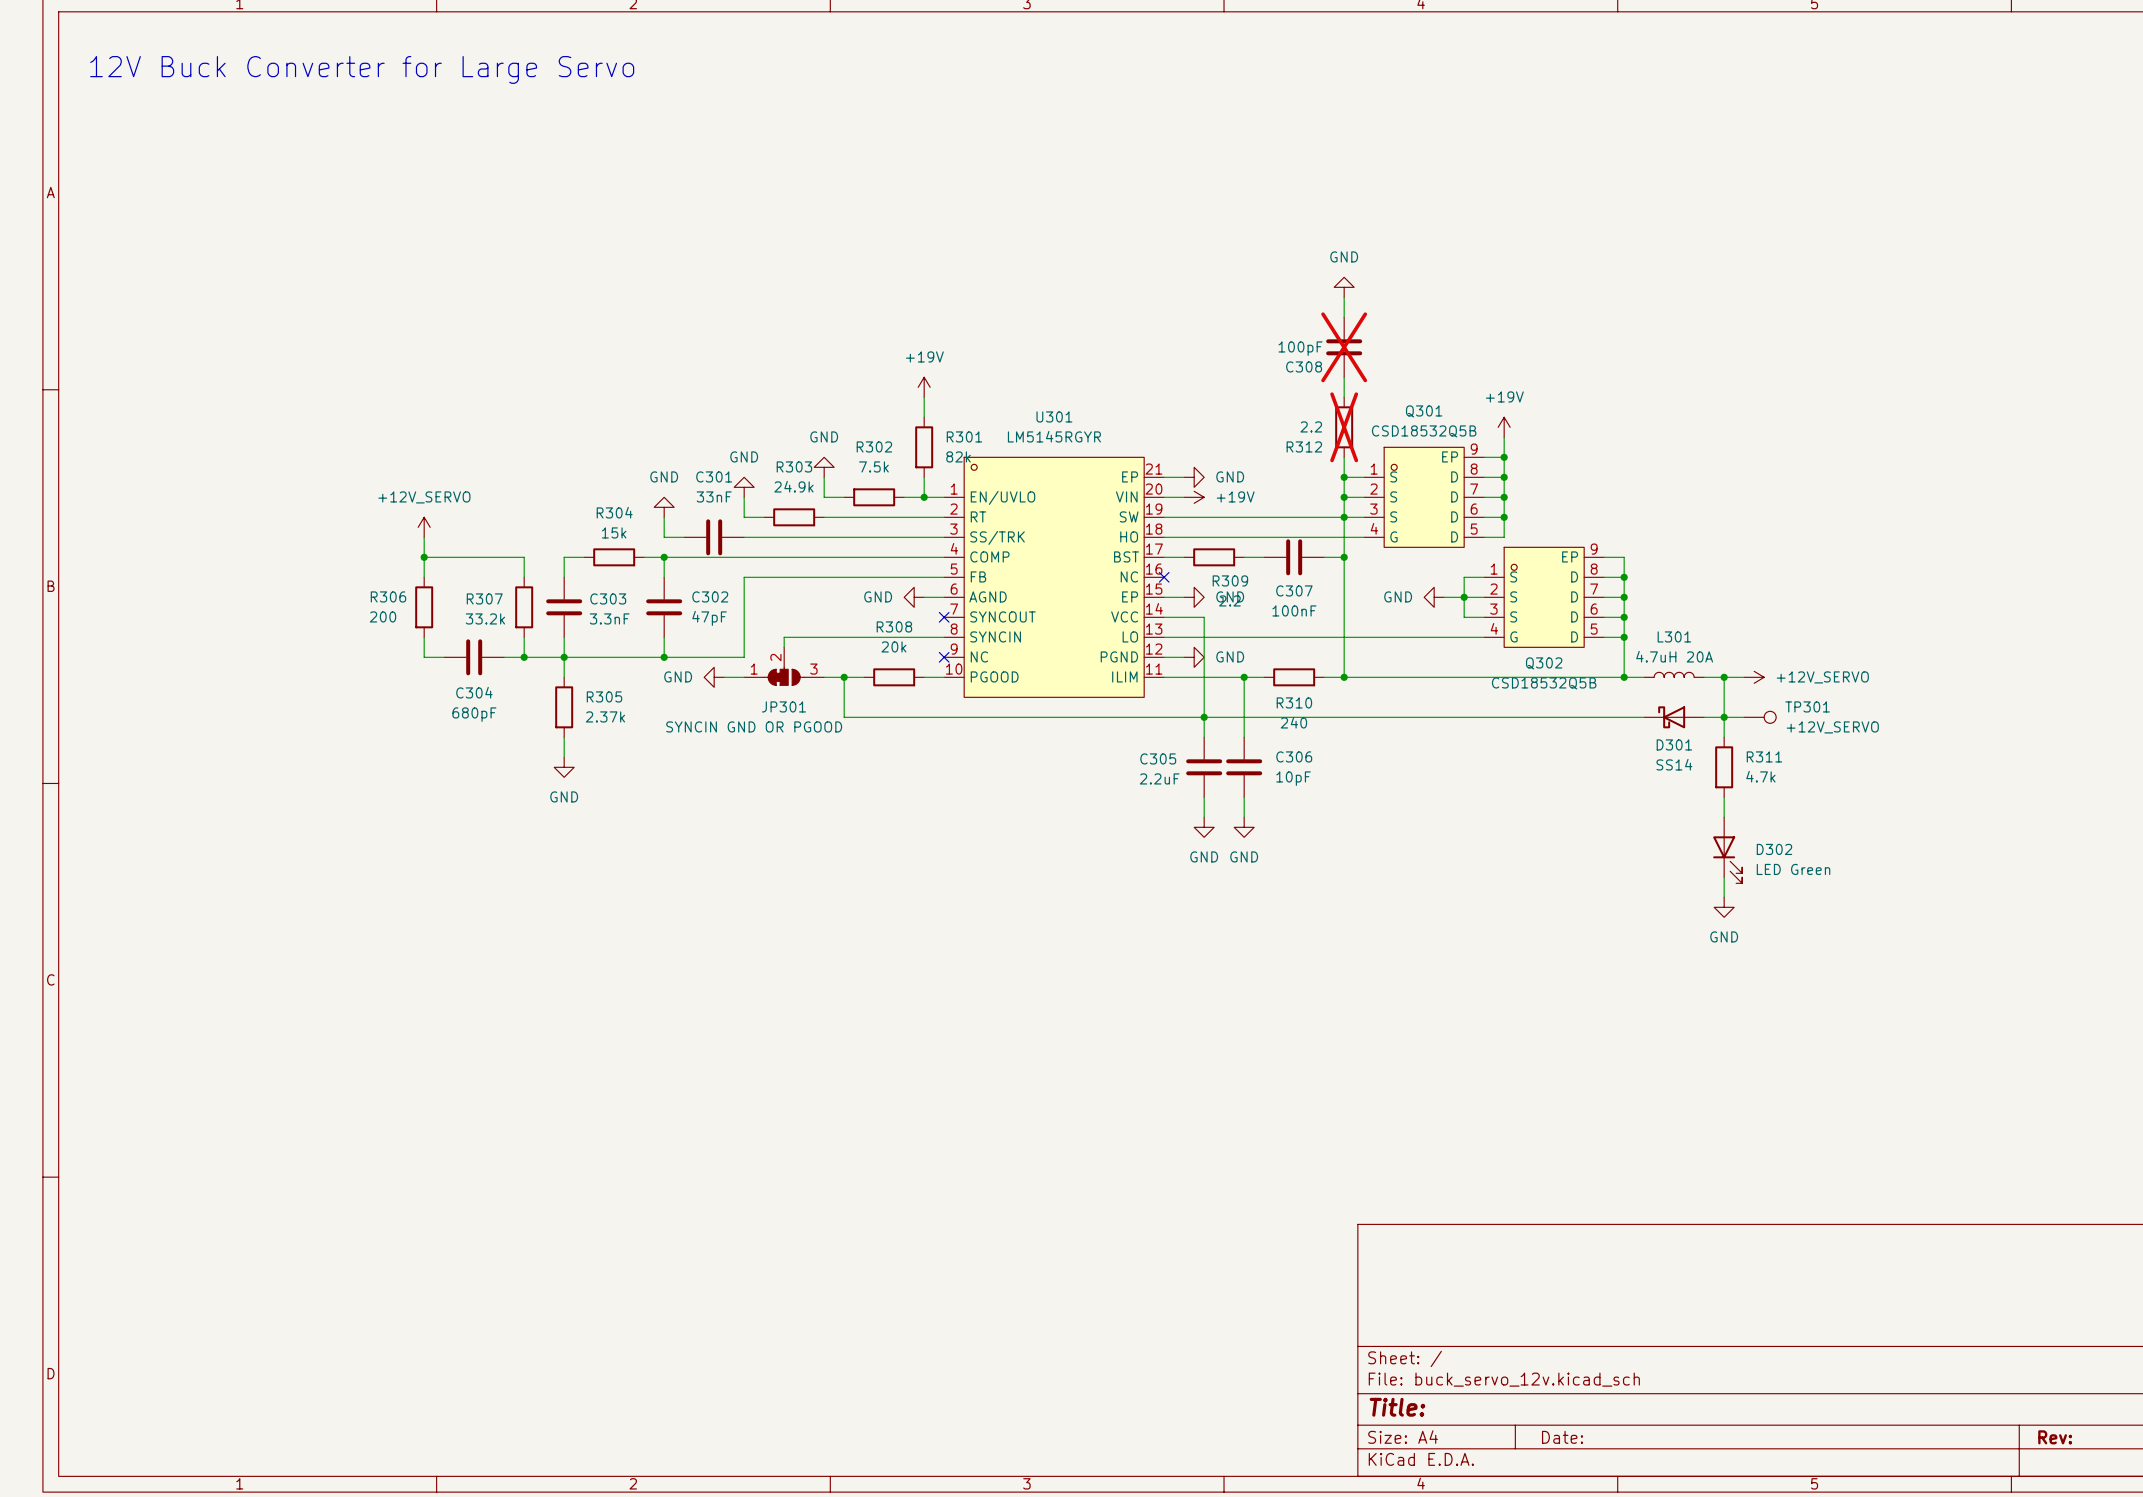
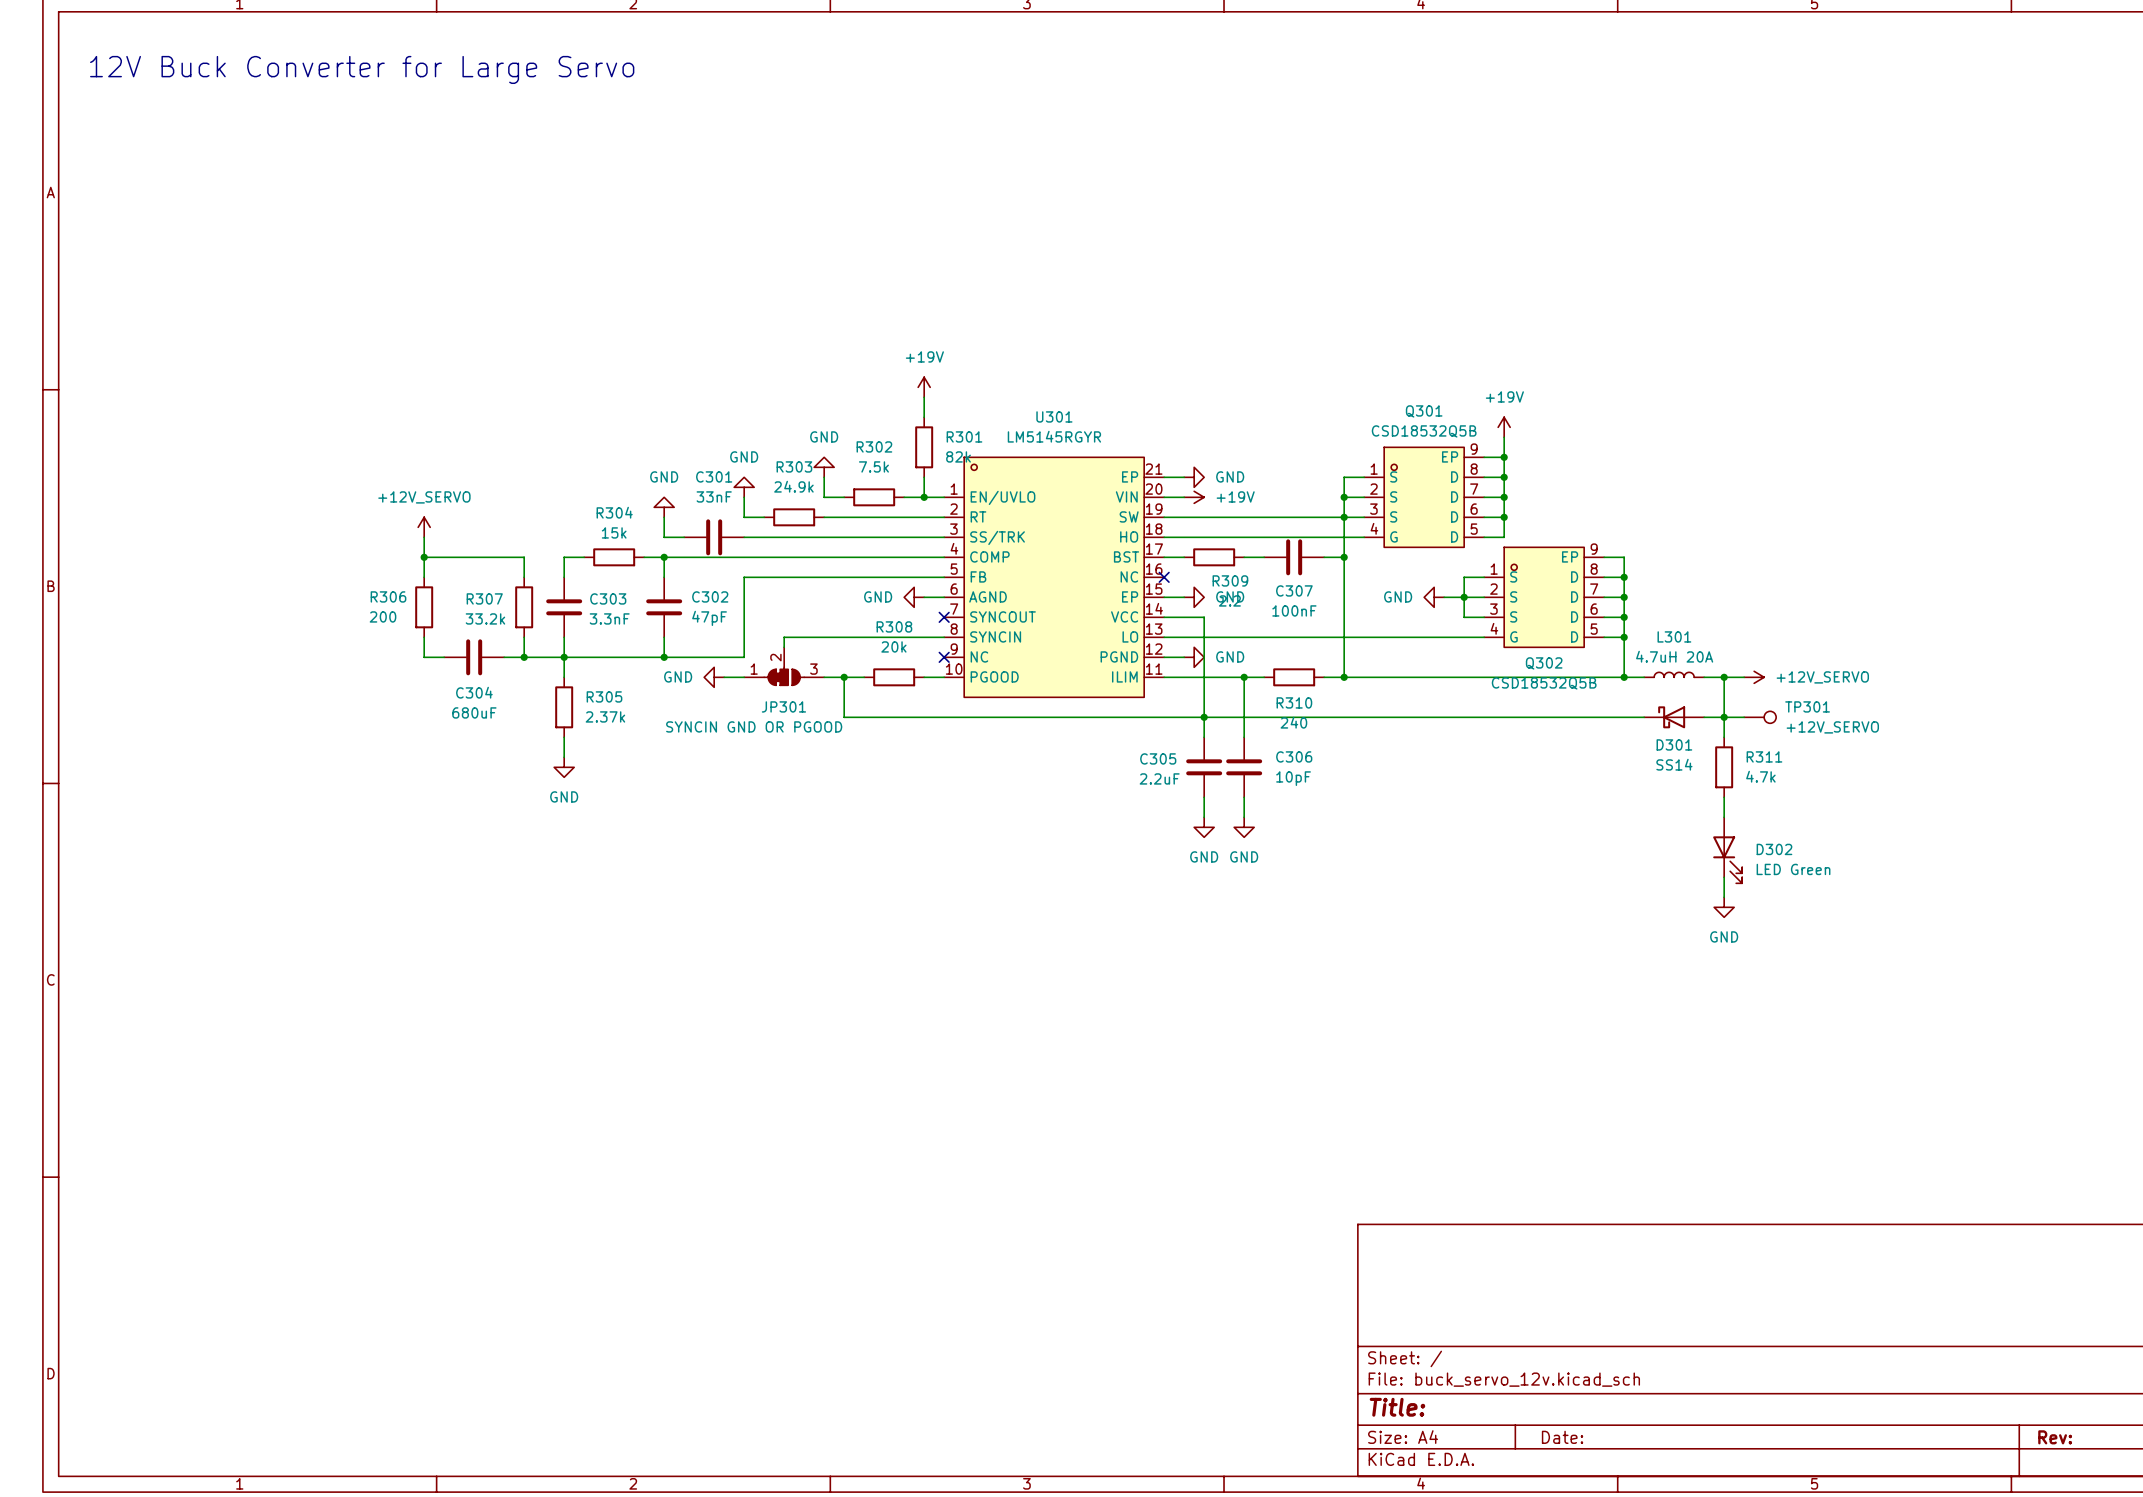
power symbol: GND (1344, 287) -> none
wire: (1344, 297) (1344, 317) -> none
C308: 100pF (1344, 347) -> none
wire: (1344, 377) (1344, 397) -> none
R312: 2.2 (1344, 427) -> none
wire: (1344, 457) (1344, 477) -> none
junction: (1344, 477) -> none
C304 value: 680pF (474, 714) -> 680uF (474, 712)

